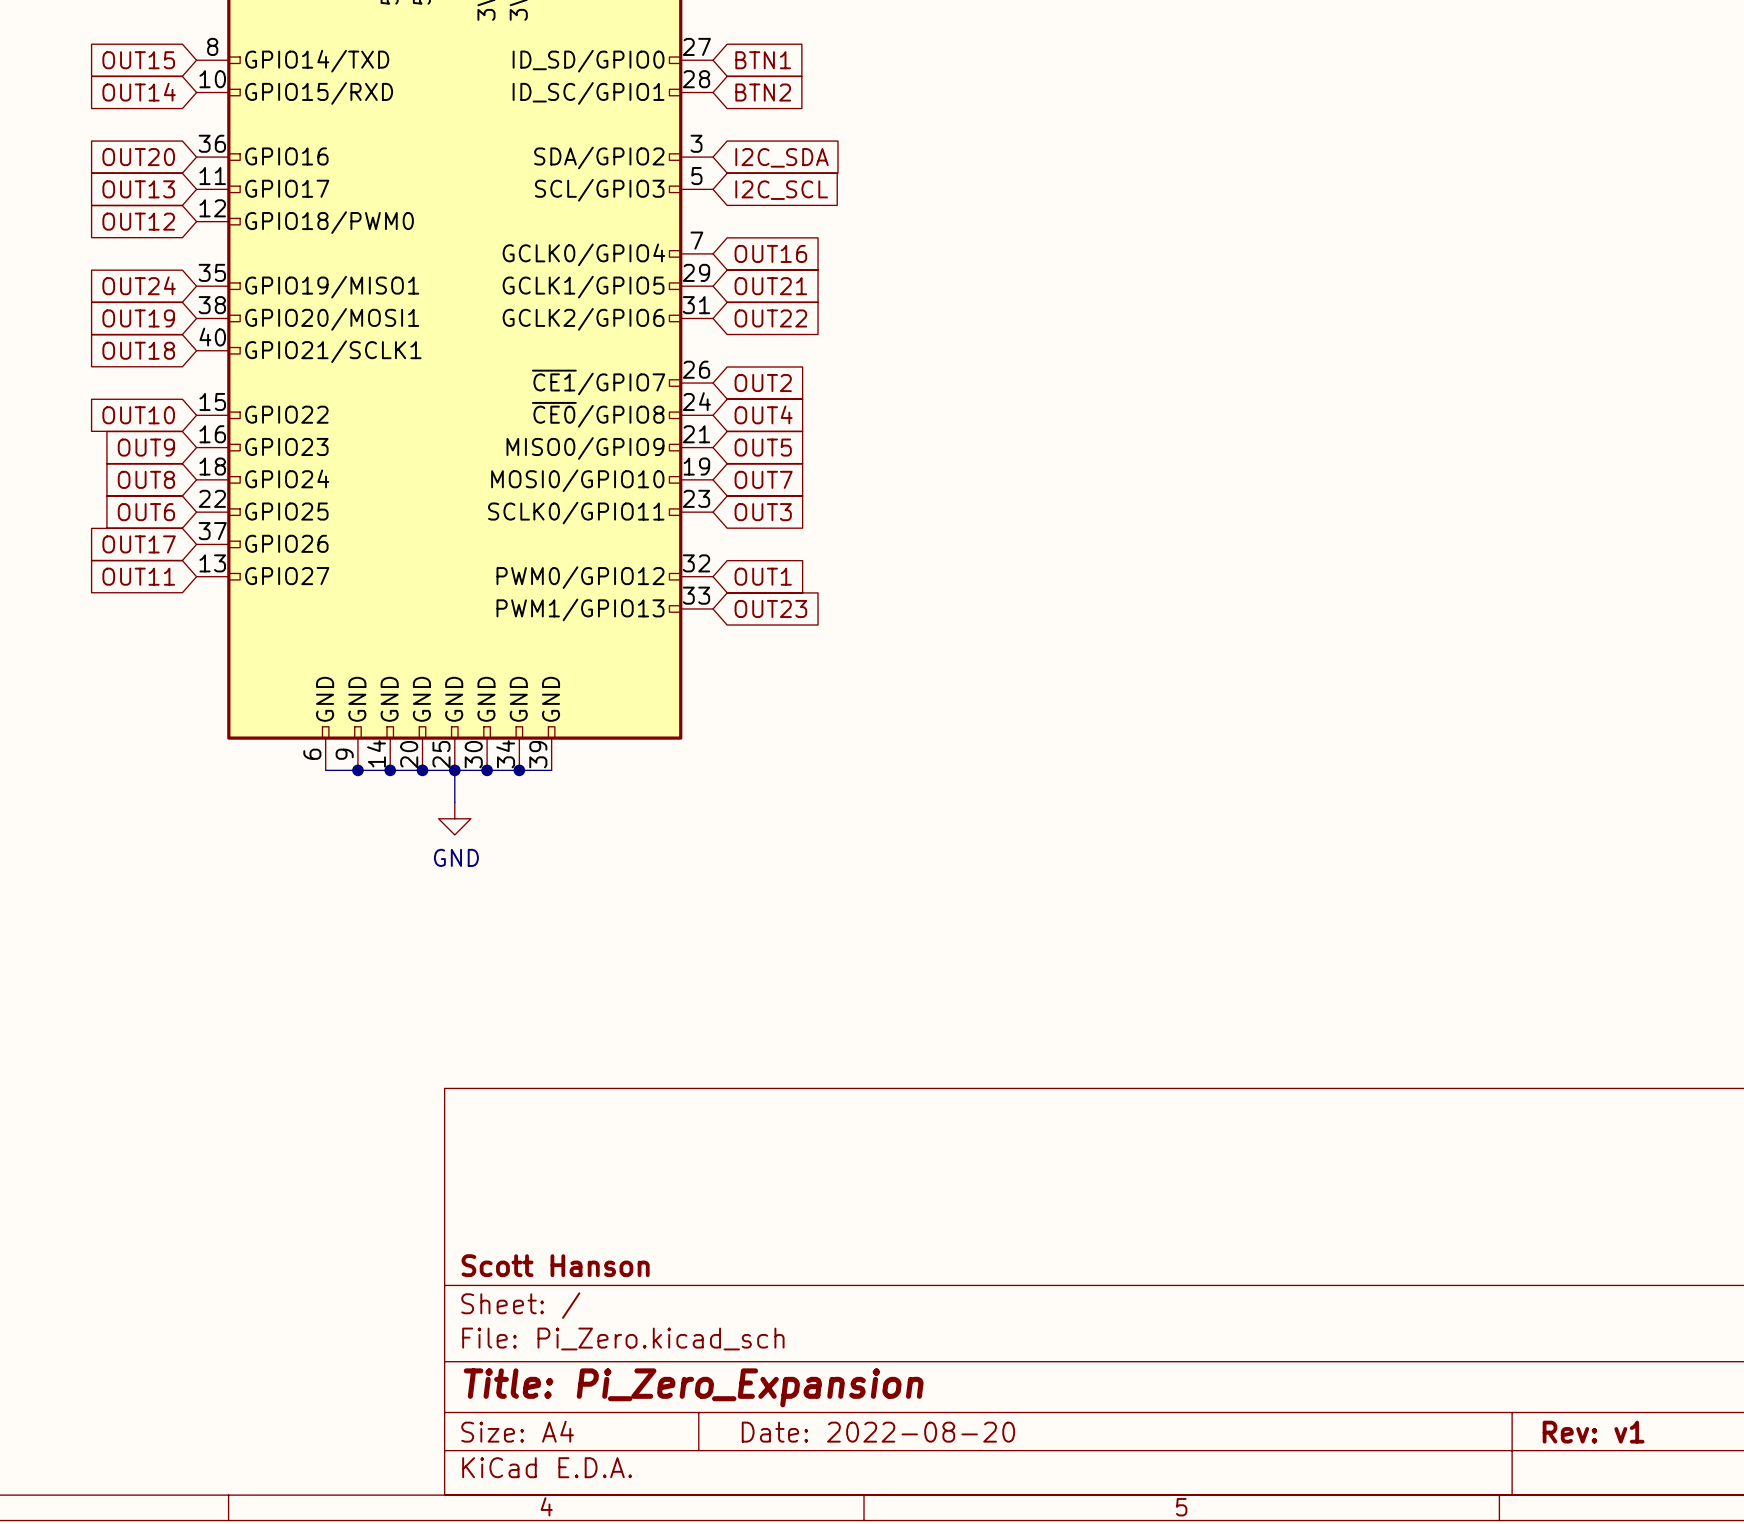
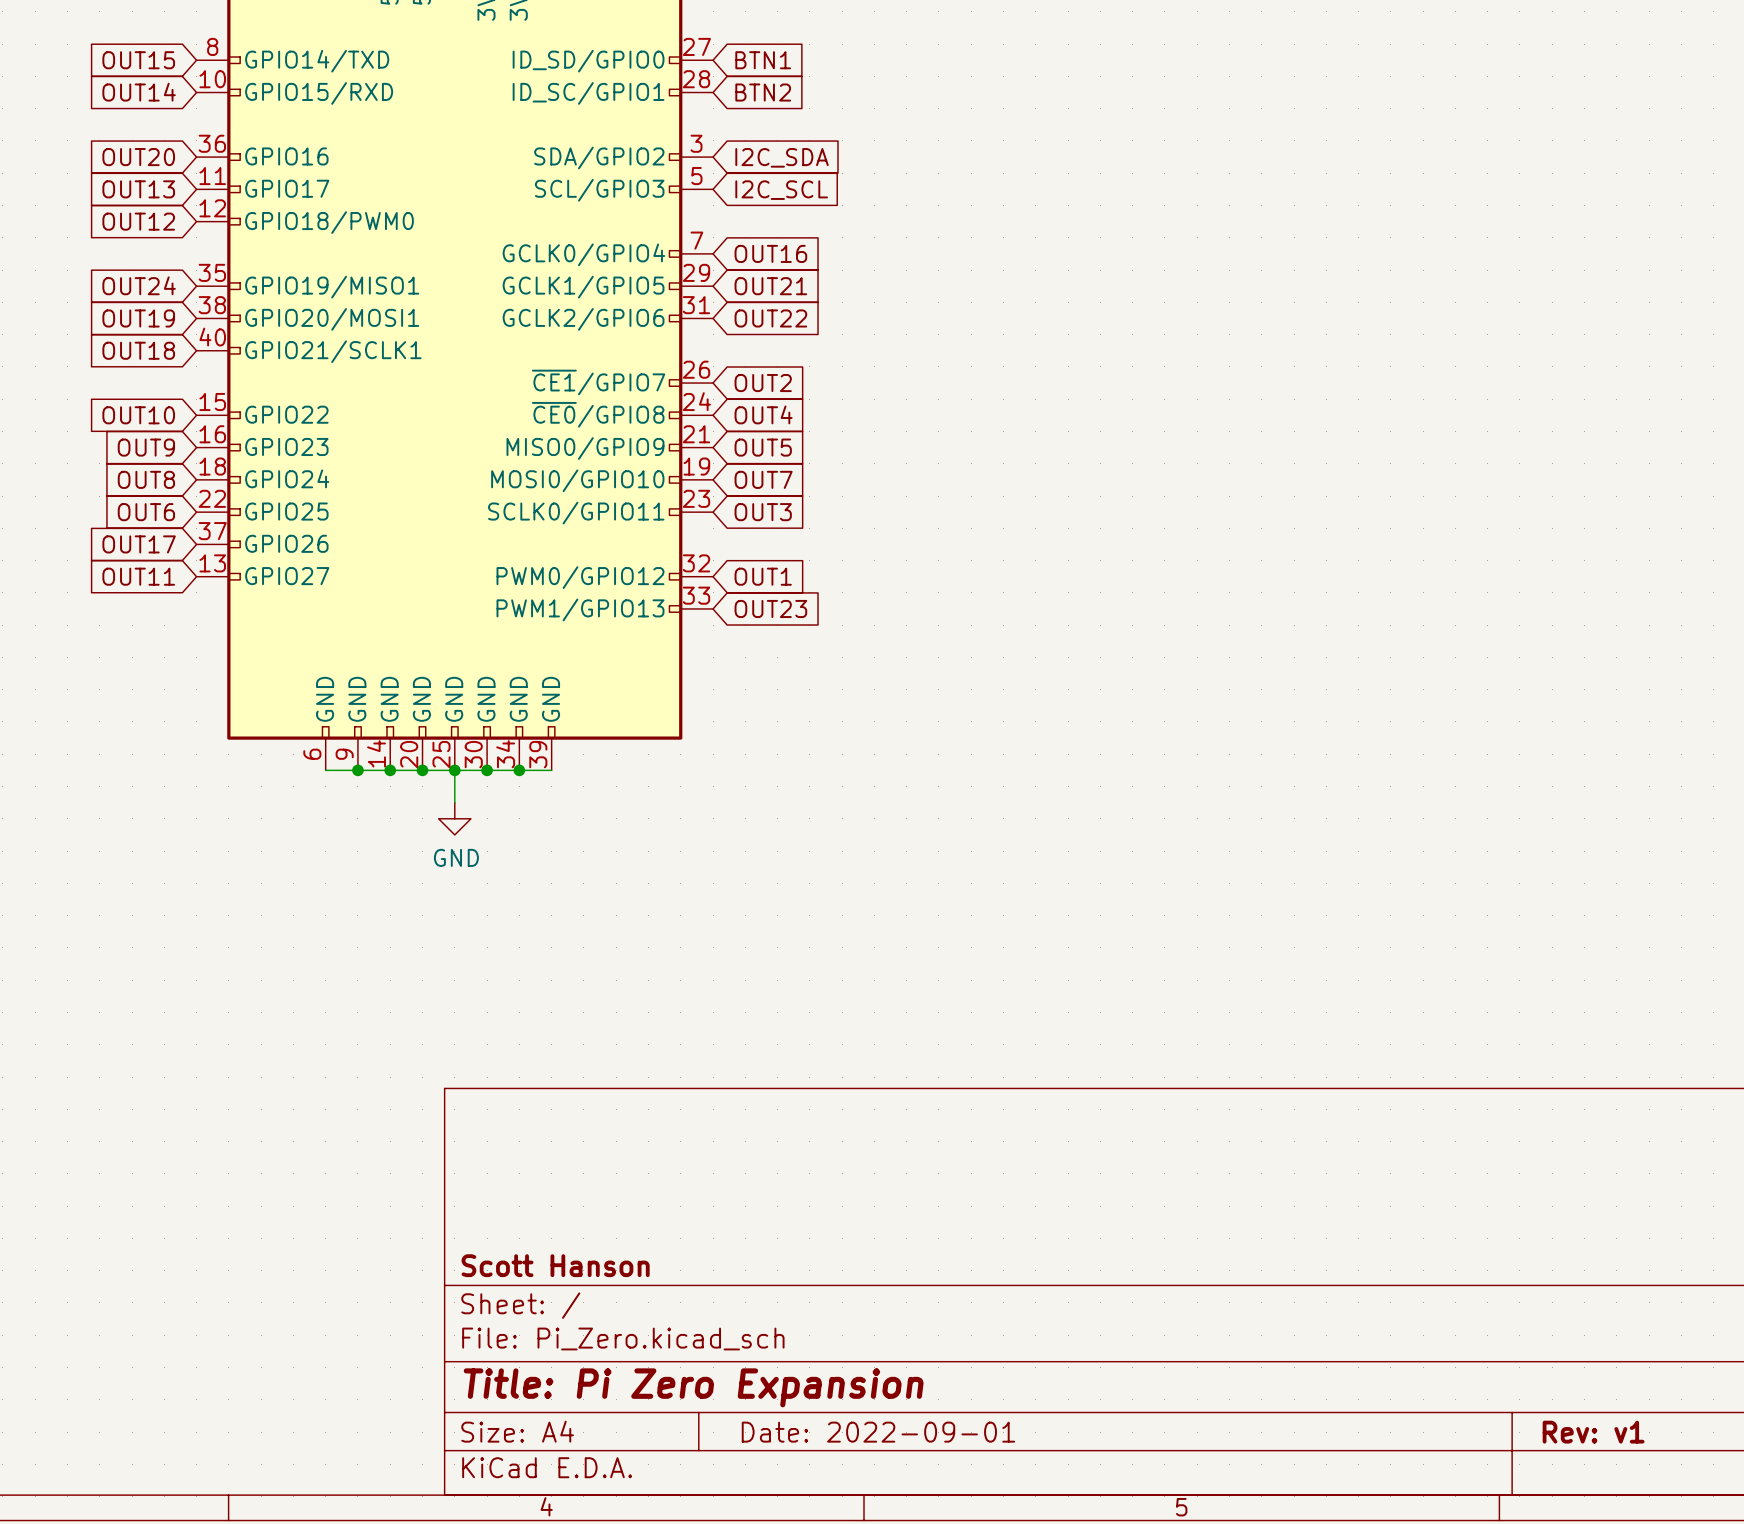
title block: Title: Pi_Zero_Expansion (693, 1387) -> Title: Pi Zero Expansion (693, 1387)
title block: Date: 2022-08-20 (878, 1432) -> Date: 2022-09-01 (878, 1432)

